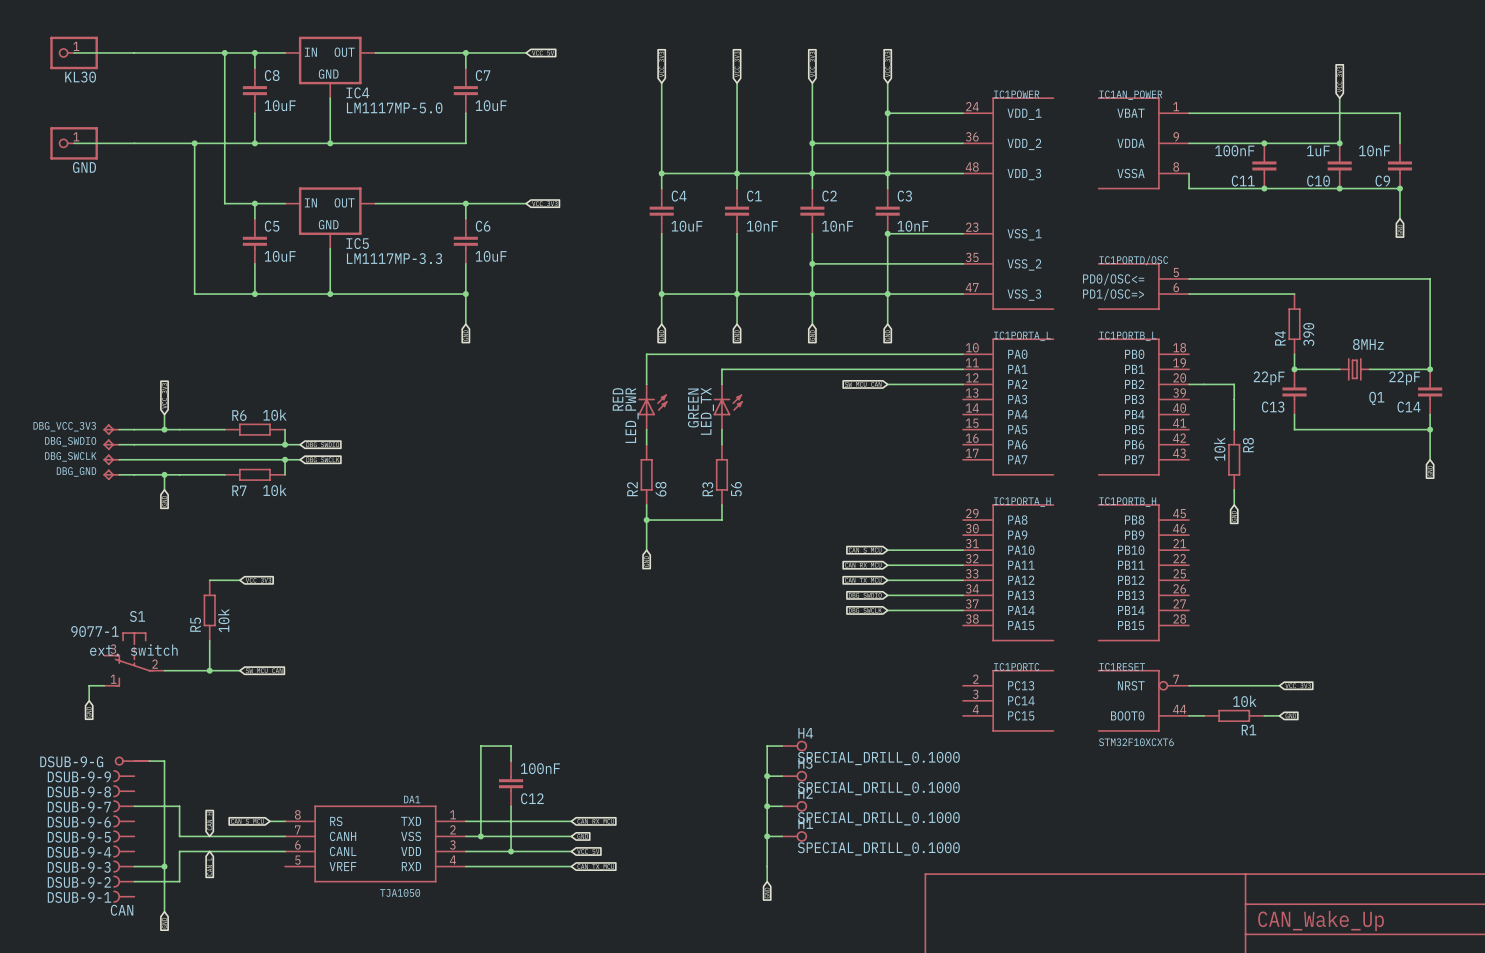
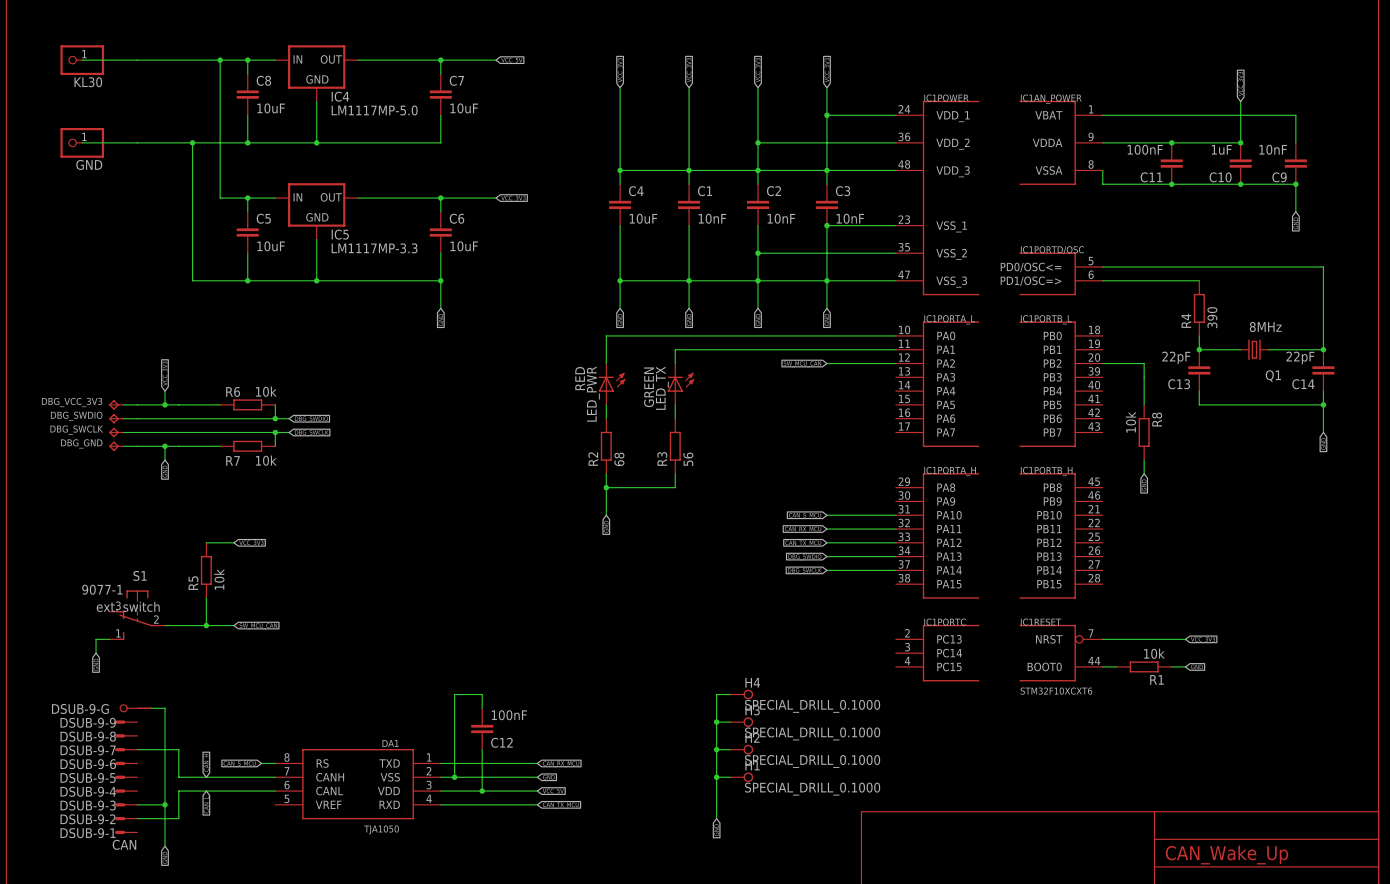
DSUB-9-9 symbol: [113, 770, 135, 783] -> [115, 720, 138, 724]
DSUB-9-8 symbol: [113, 785, 135, 798] -> [115, 734, 138, 738]
DSUB-9-7 symbol: [113, 800, 135, 813] -> [115, 748, 138, 752]
DSUB-9-6 symbol: [113, 815, 135, 828] -> [115, 761, 138, 766]
DSUB-9-5 symbol: [113, 830, 135, 843] -> [115, 775, 138, 779]
DSUB-9-4 symbol: [113, 845, 135, 858] -> [115, 789, 138, 793]
DSUB-9-3 symbol: [113, 860, 135, 873] -> [115, 803, 138, 807]
DSUB-9-2 symbol: [113, 875, 135, 888] -> [115, 816, 138, 821]
DSUB-9-1 symbol: [113, 890, 135, 903] -> [115, 830, 138, 835]

